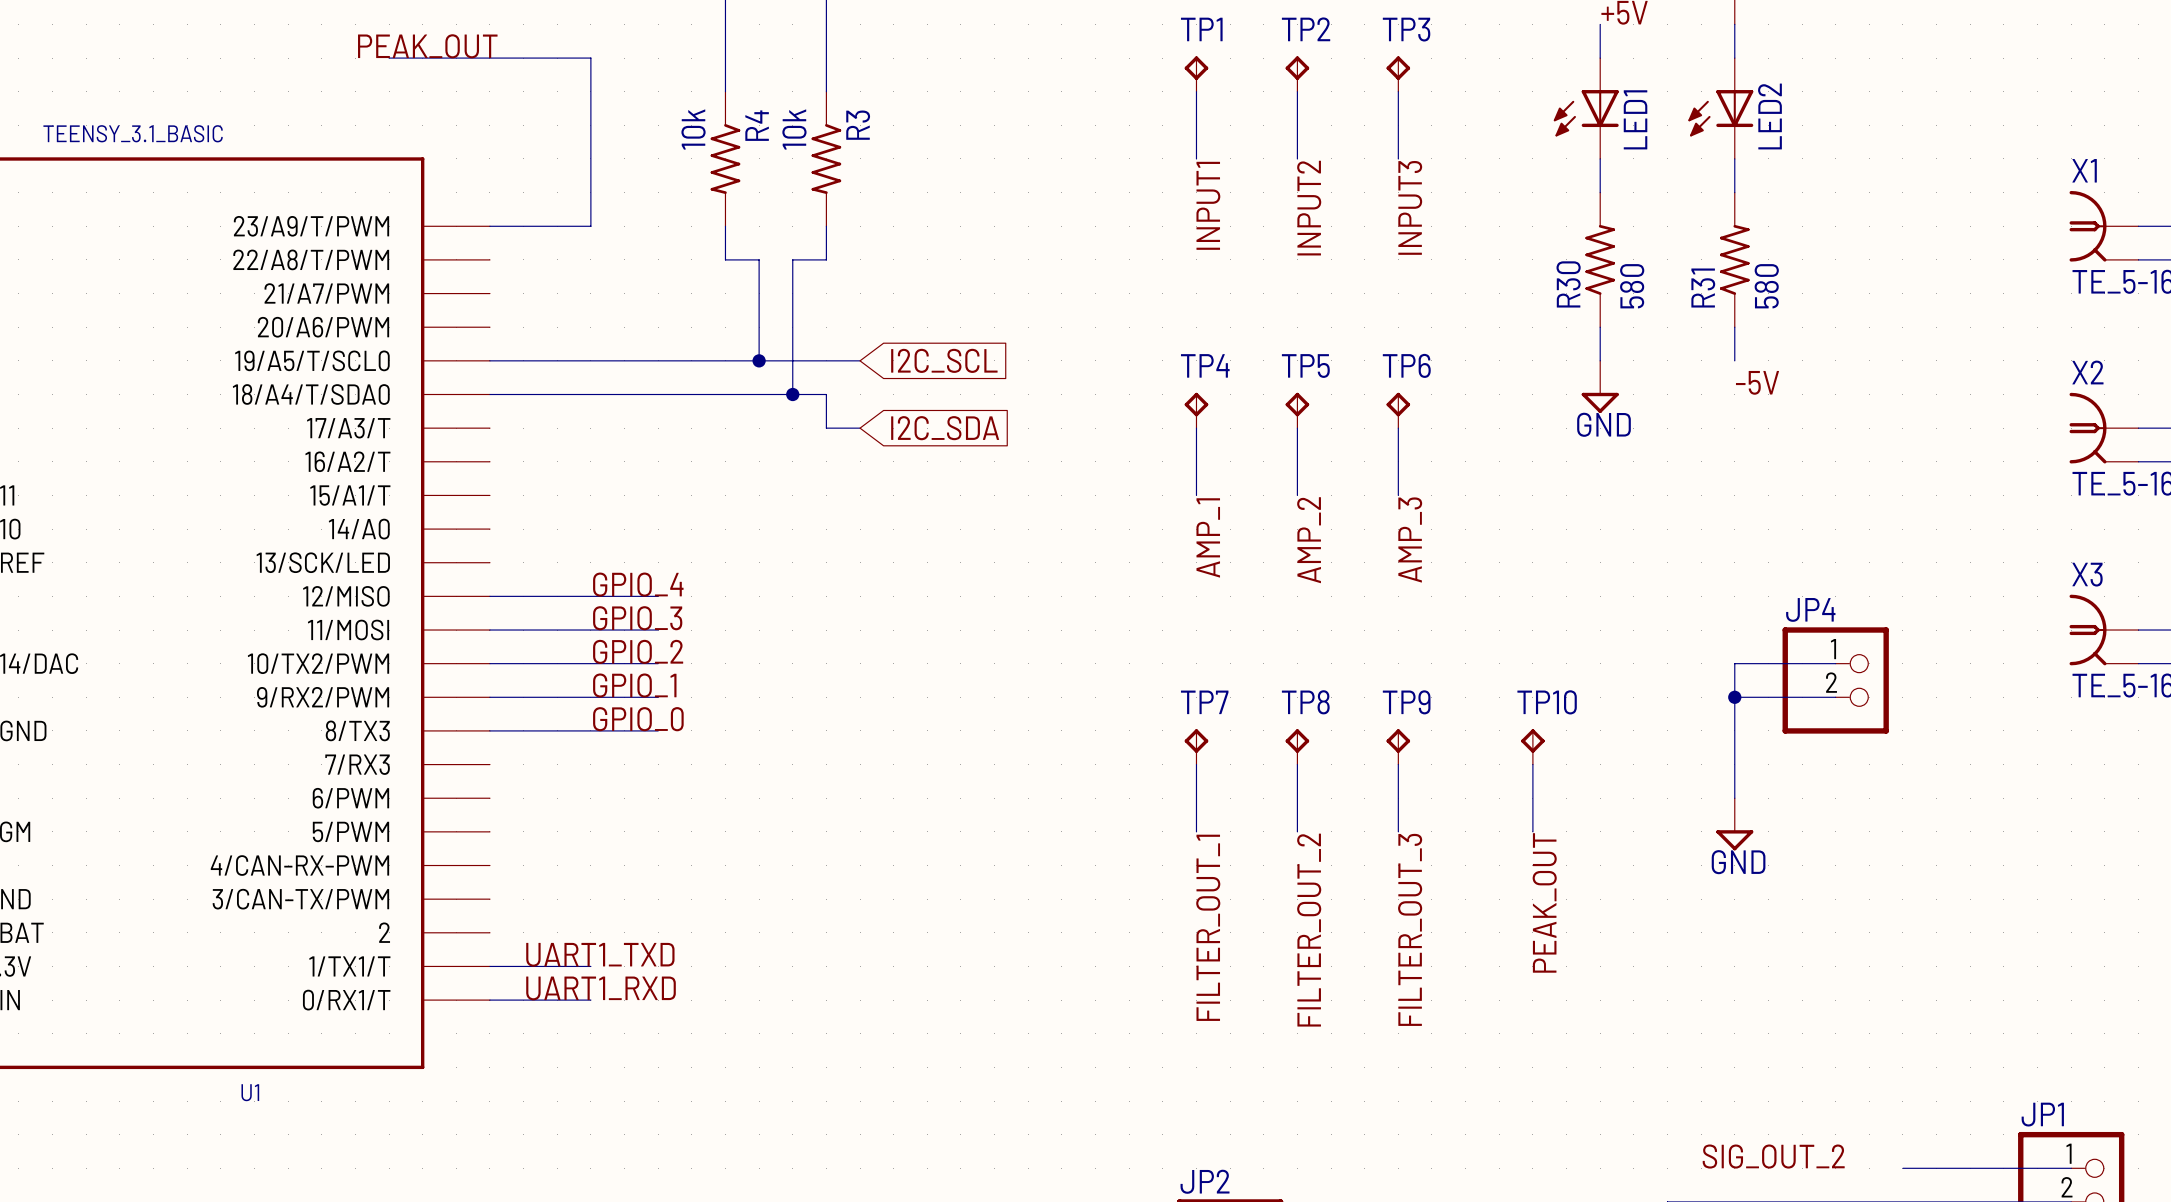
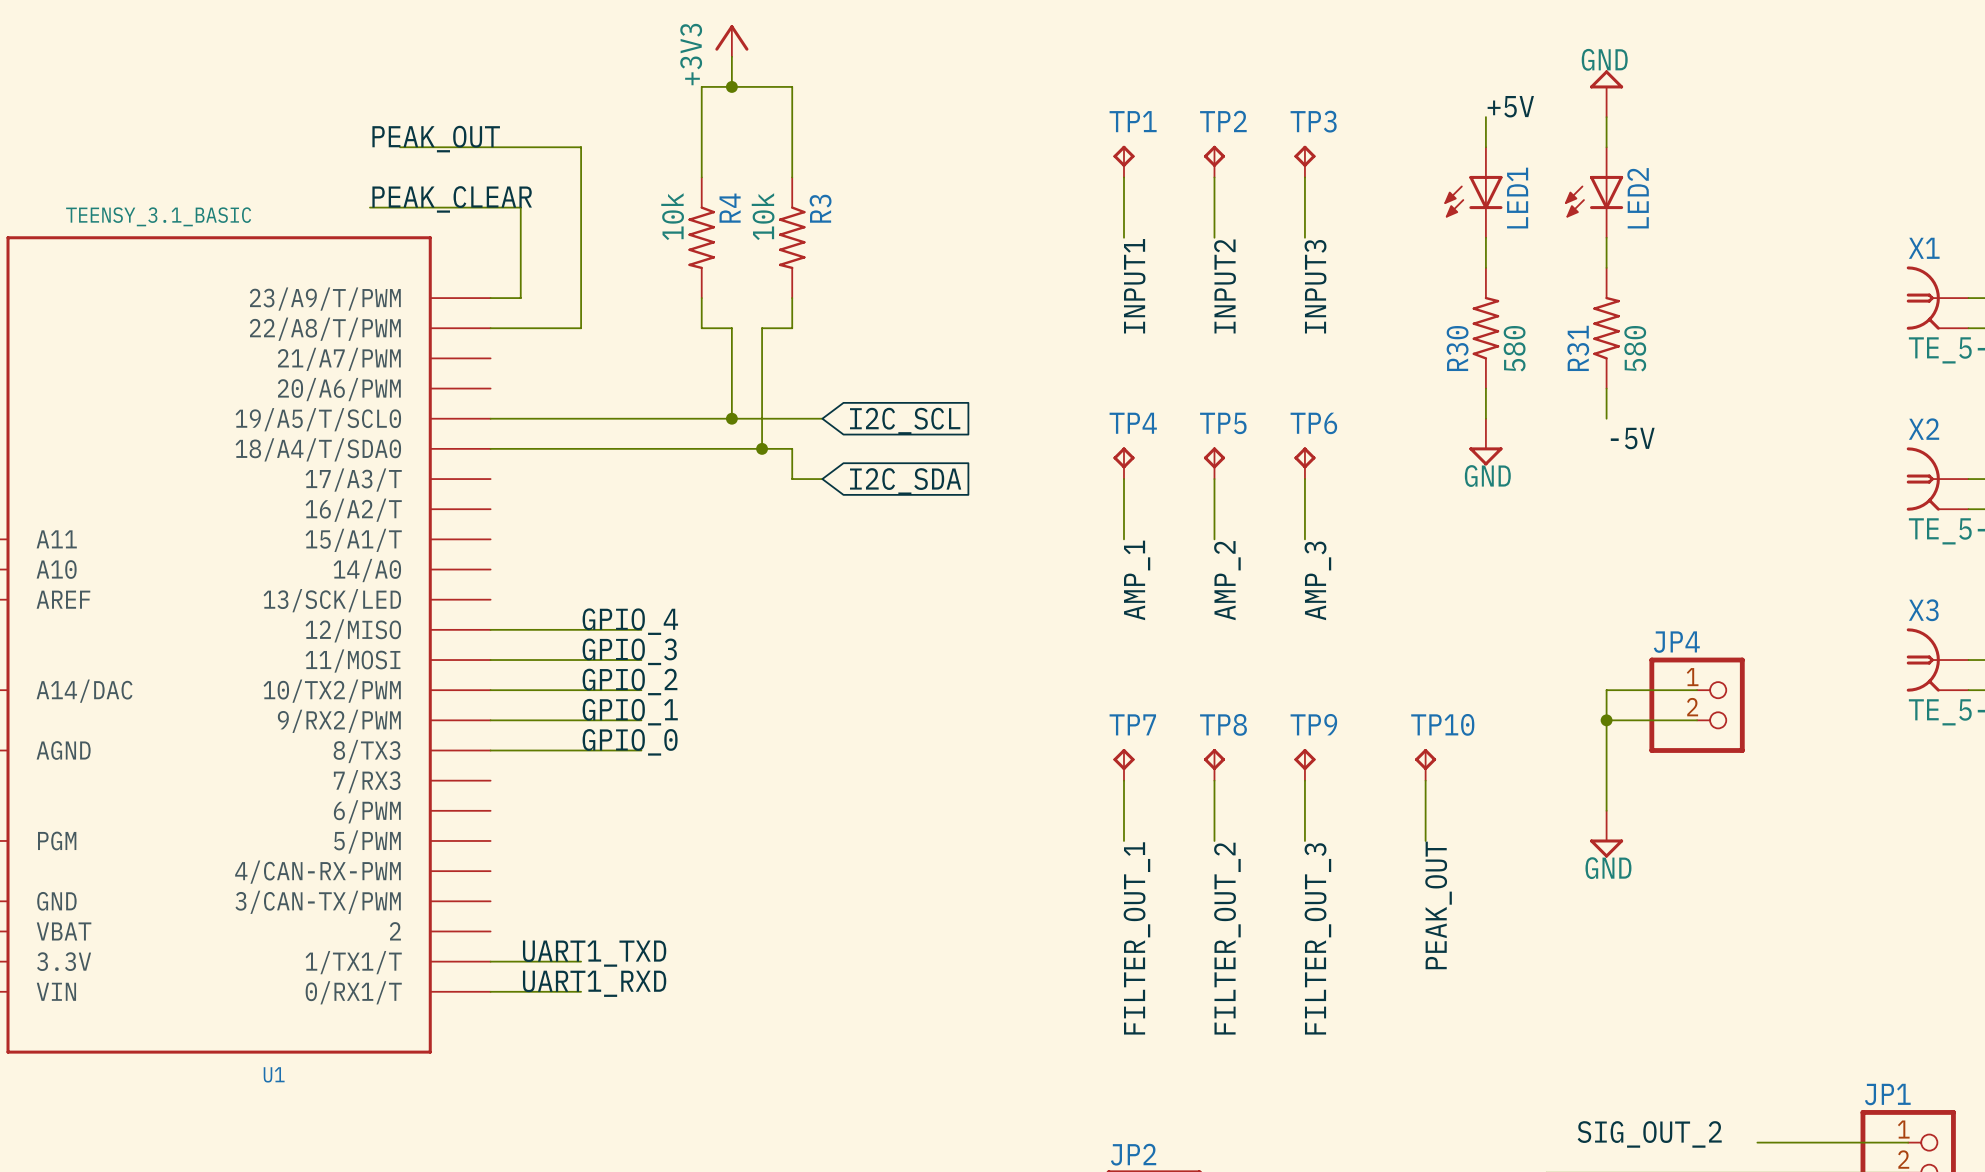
label: none -> PEAK_CLEAR (452, 199)
wire: none -> (369, 207) (520, 207) (520, 298)
wire: (523, 226) (590, 226) -> (490, 328) (581, 328) (581, 298)

